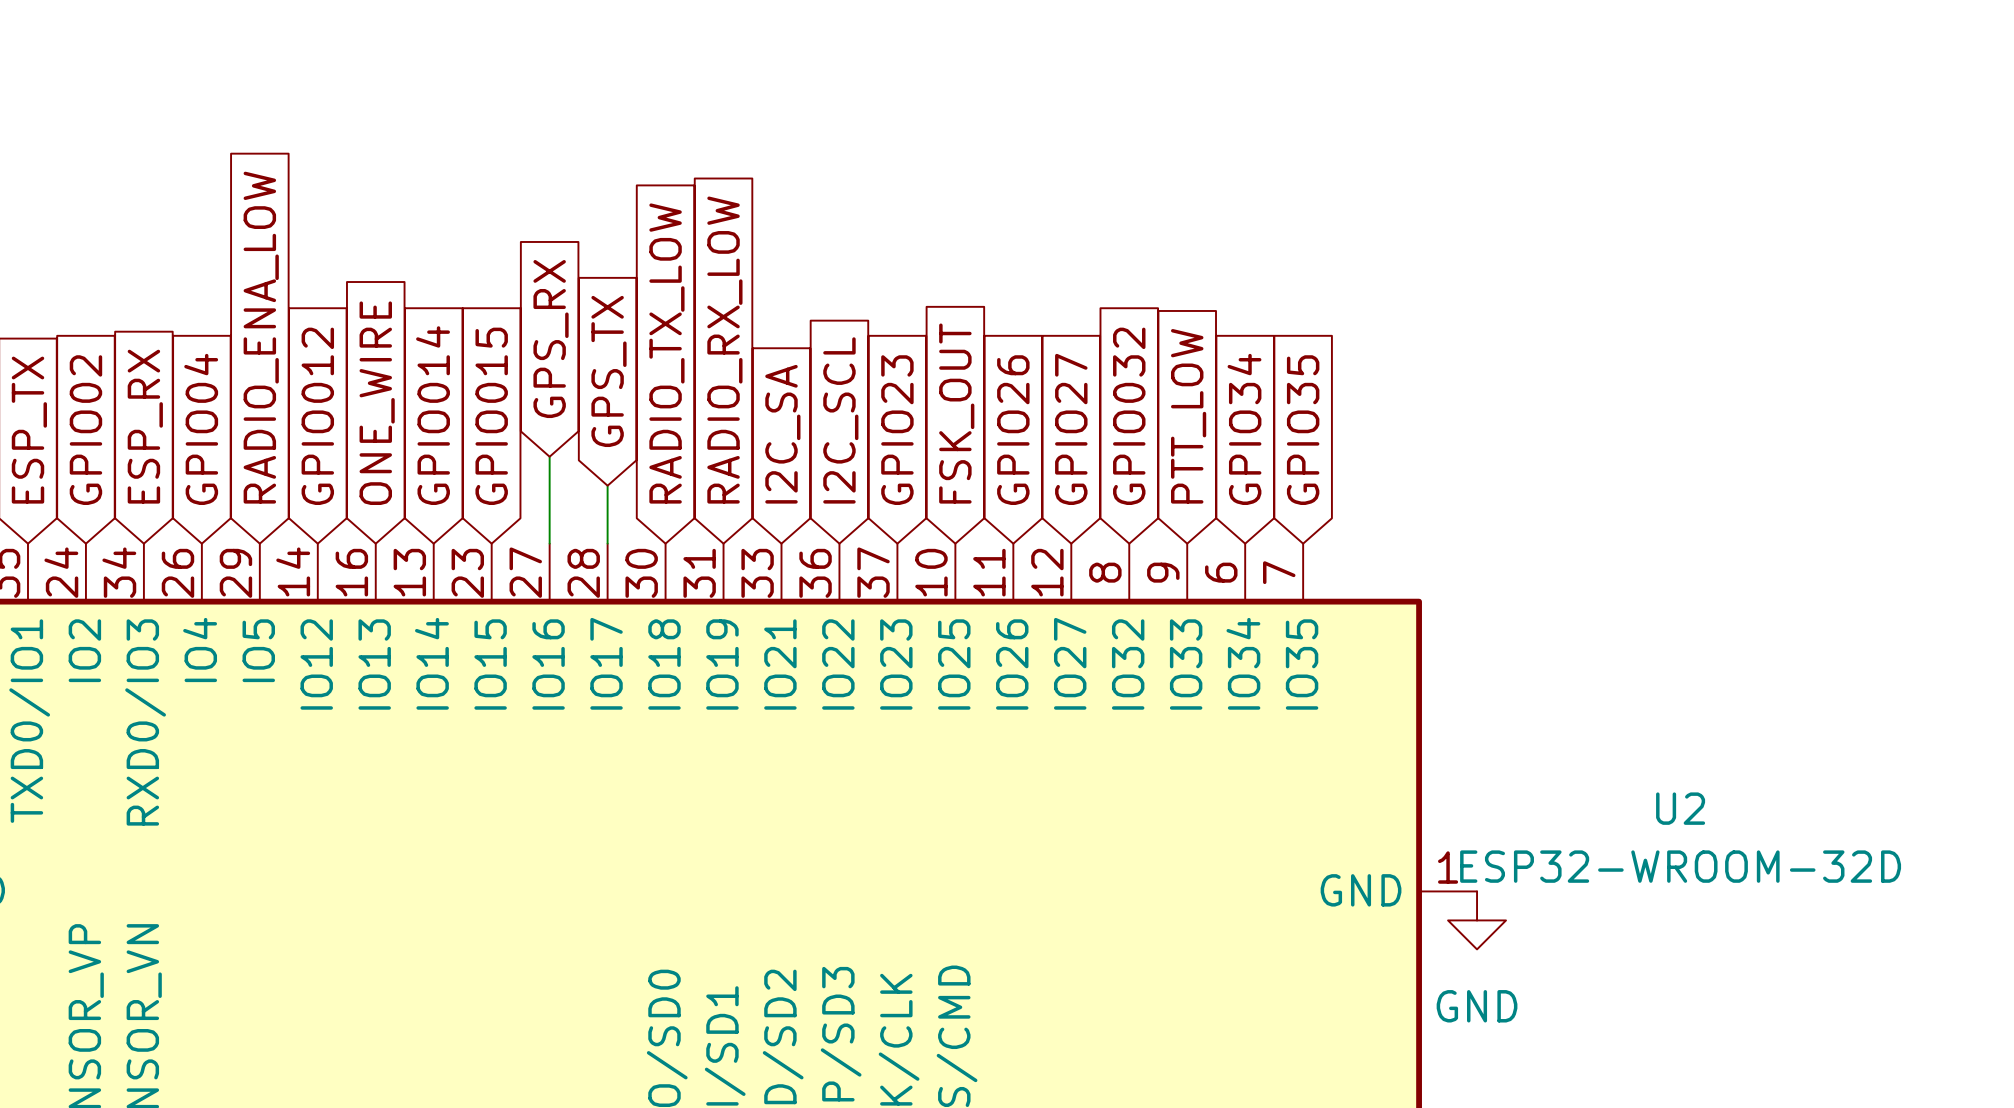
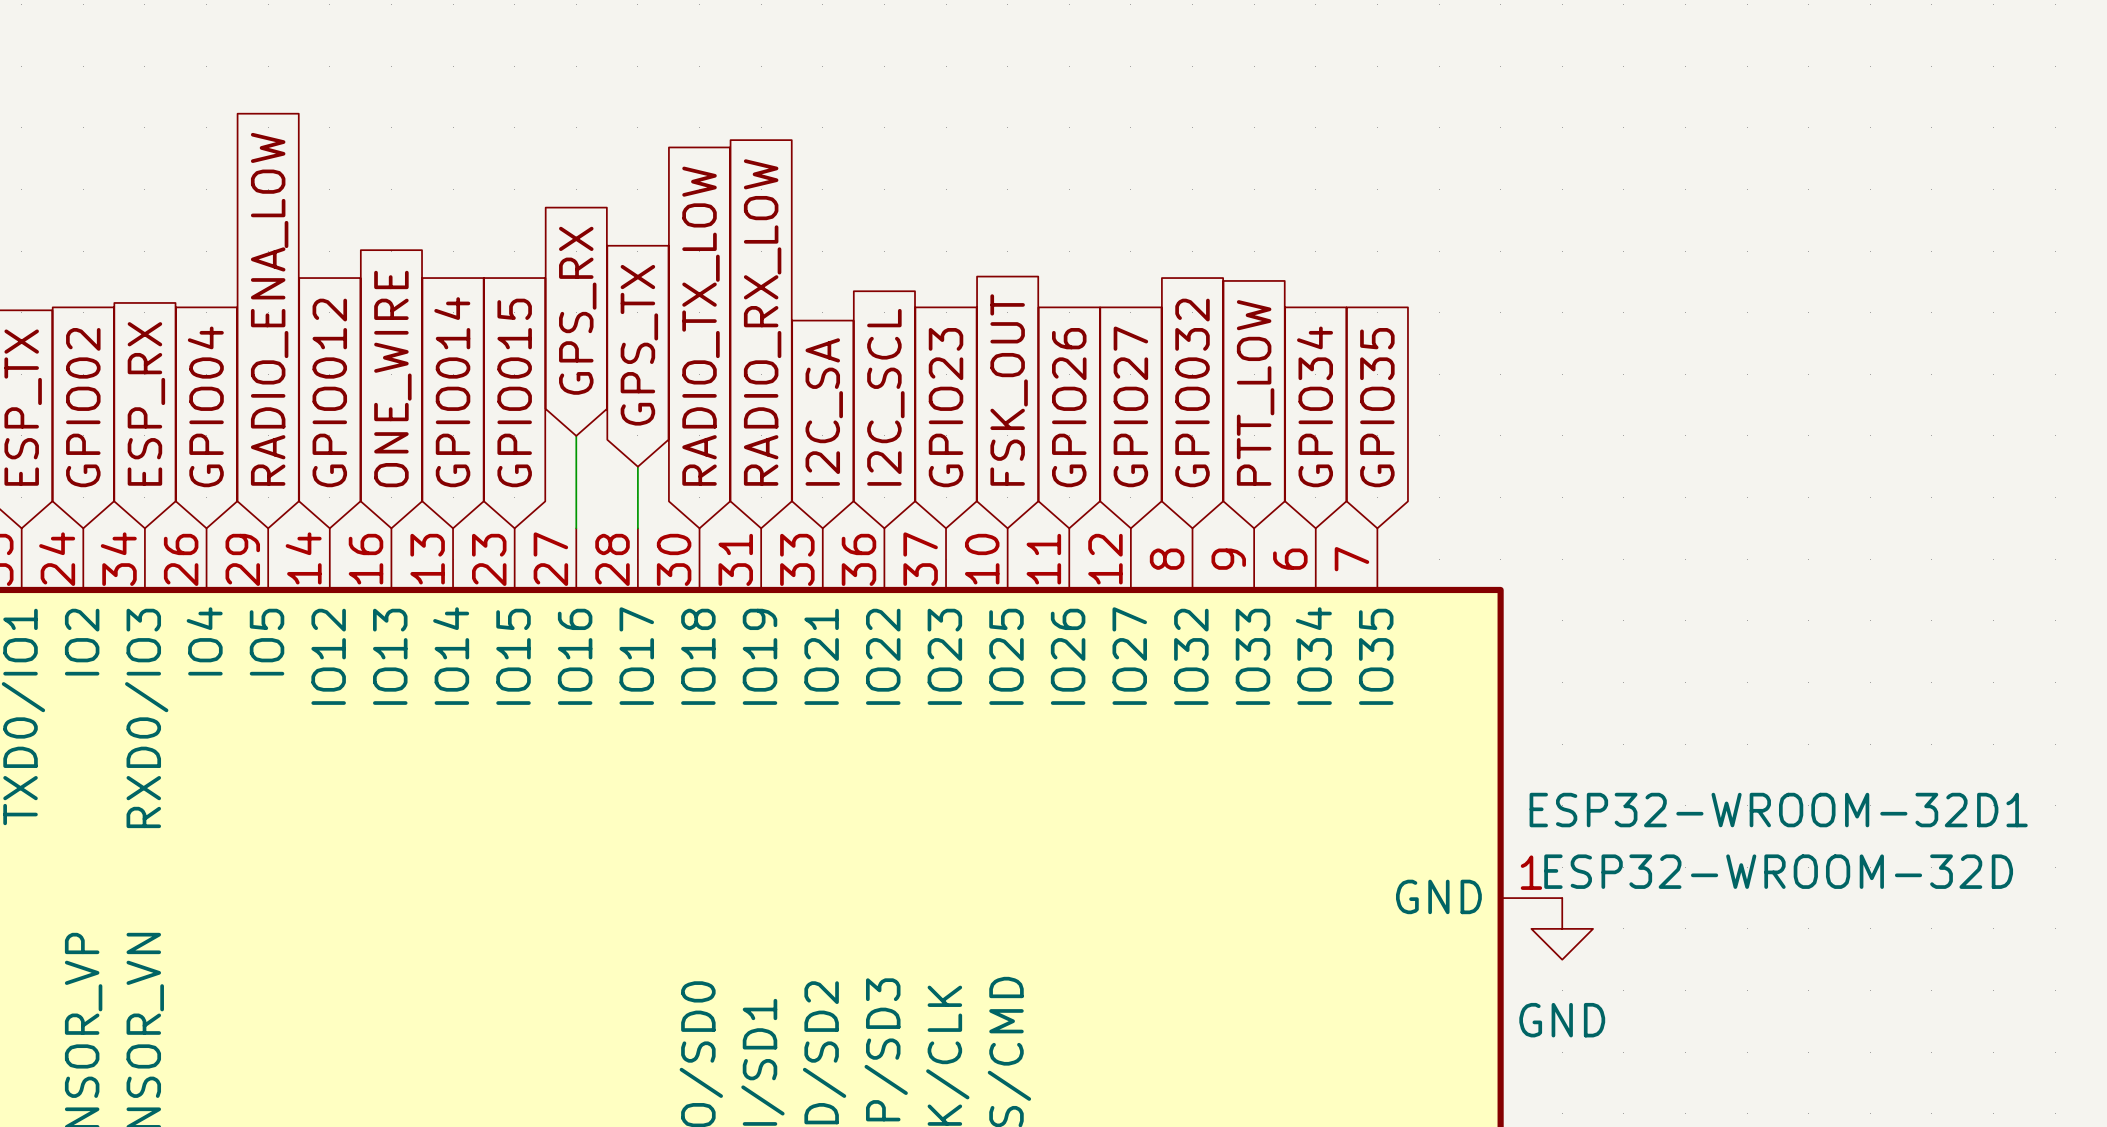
U2 name: U2 (1680, 808) -> ESP32-WROOM-32D1 (1778, 810)

